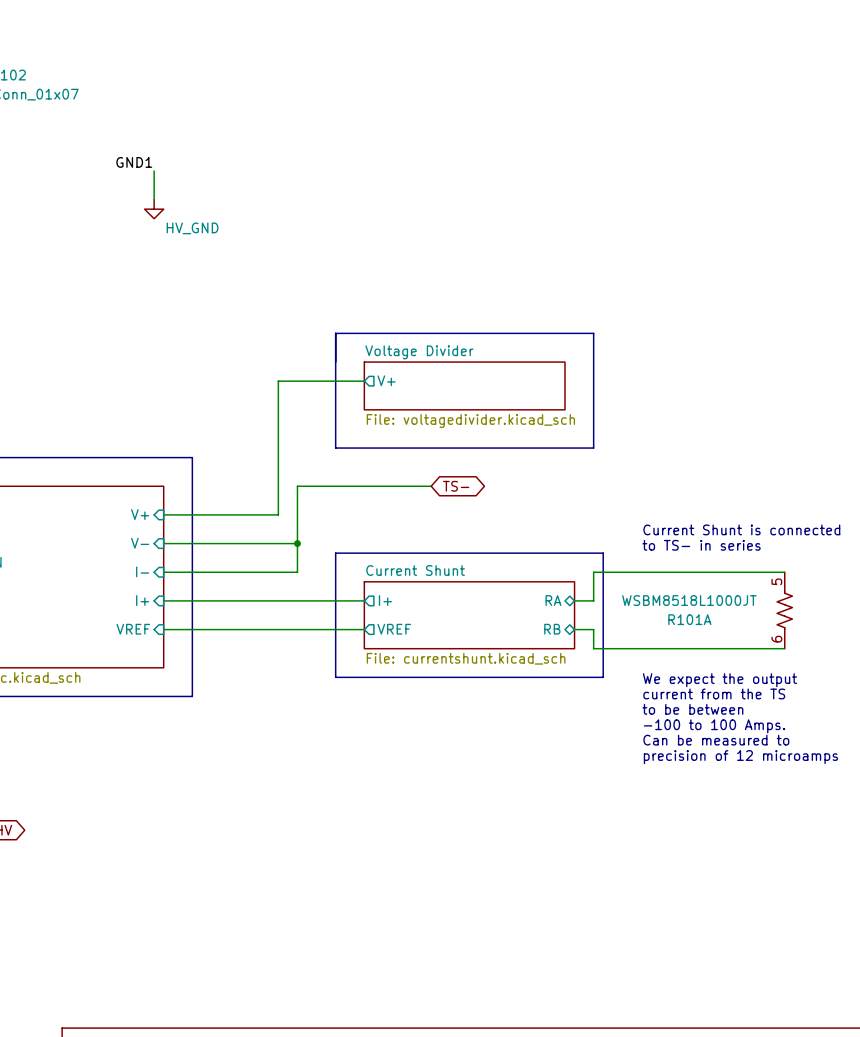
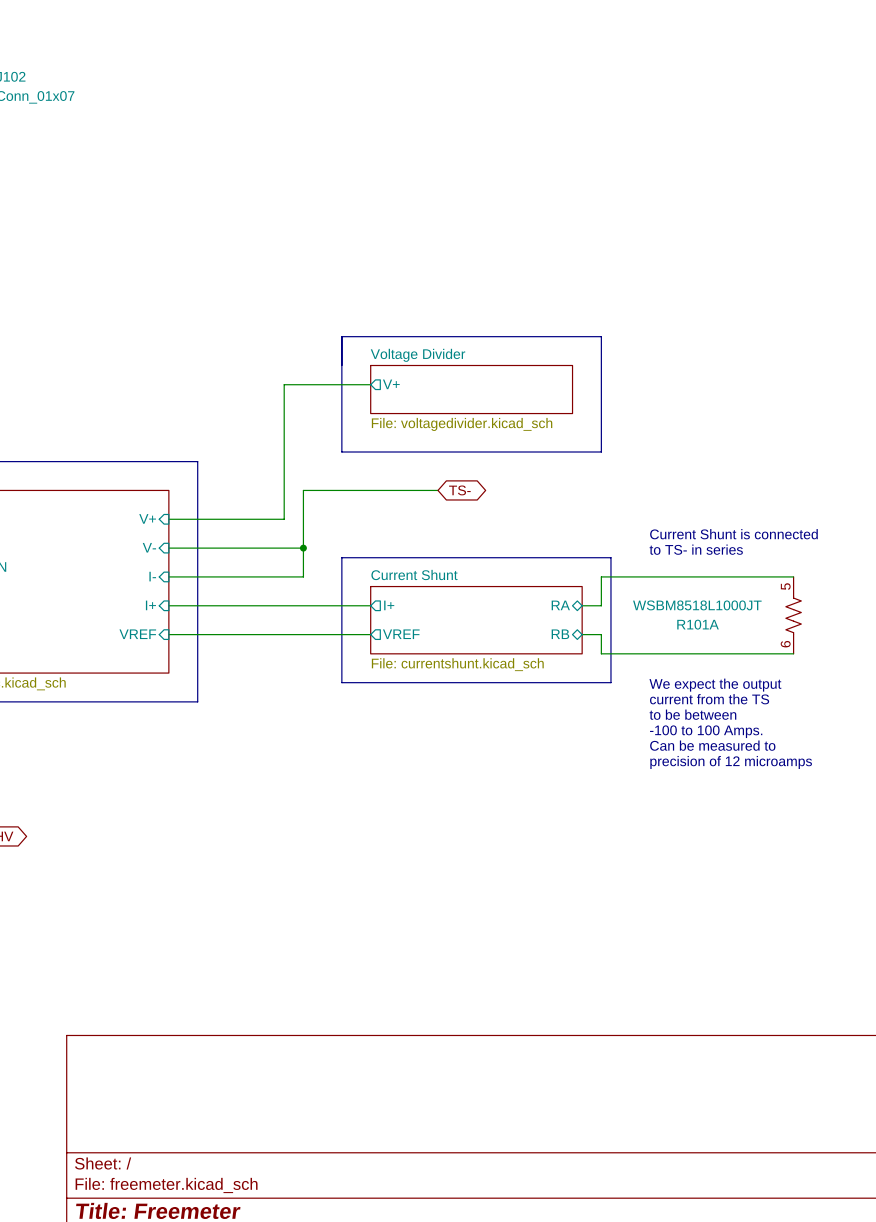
label: GND1 (134, 162) -> none
wire: (154, 170) (154, 199) -> none
power symbol: HV_GND (154, 209) -> none

